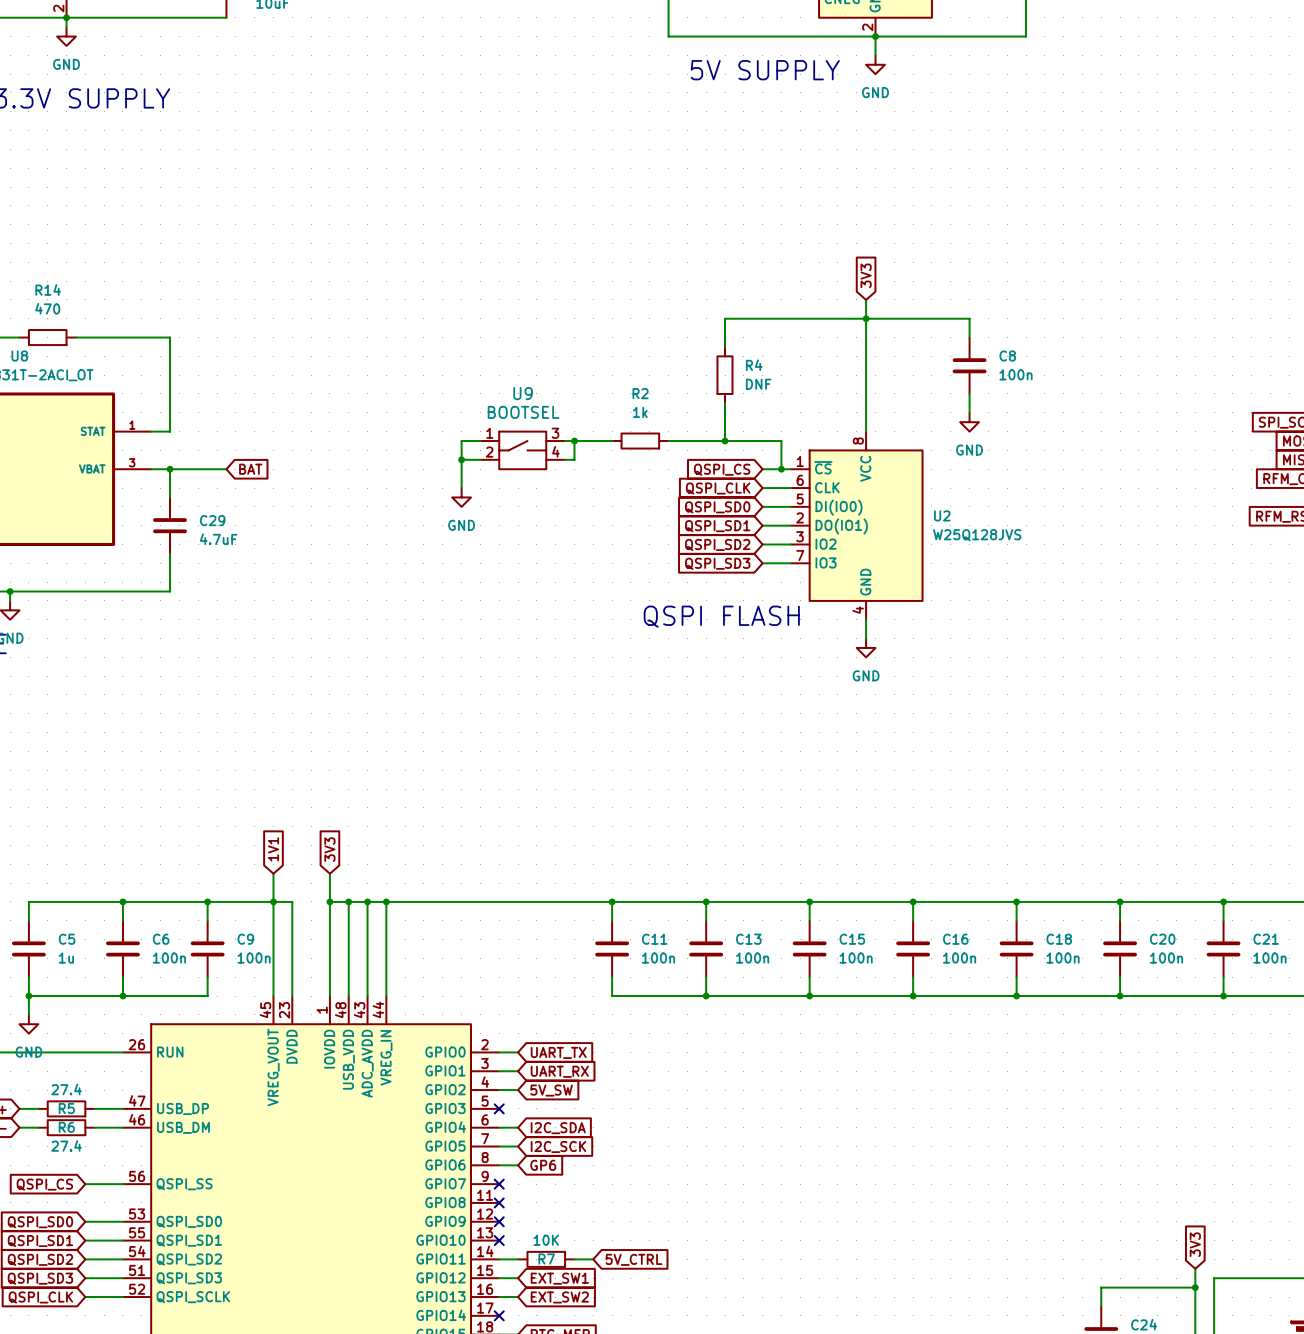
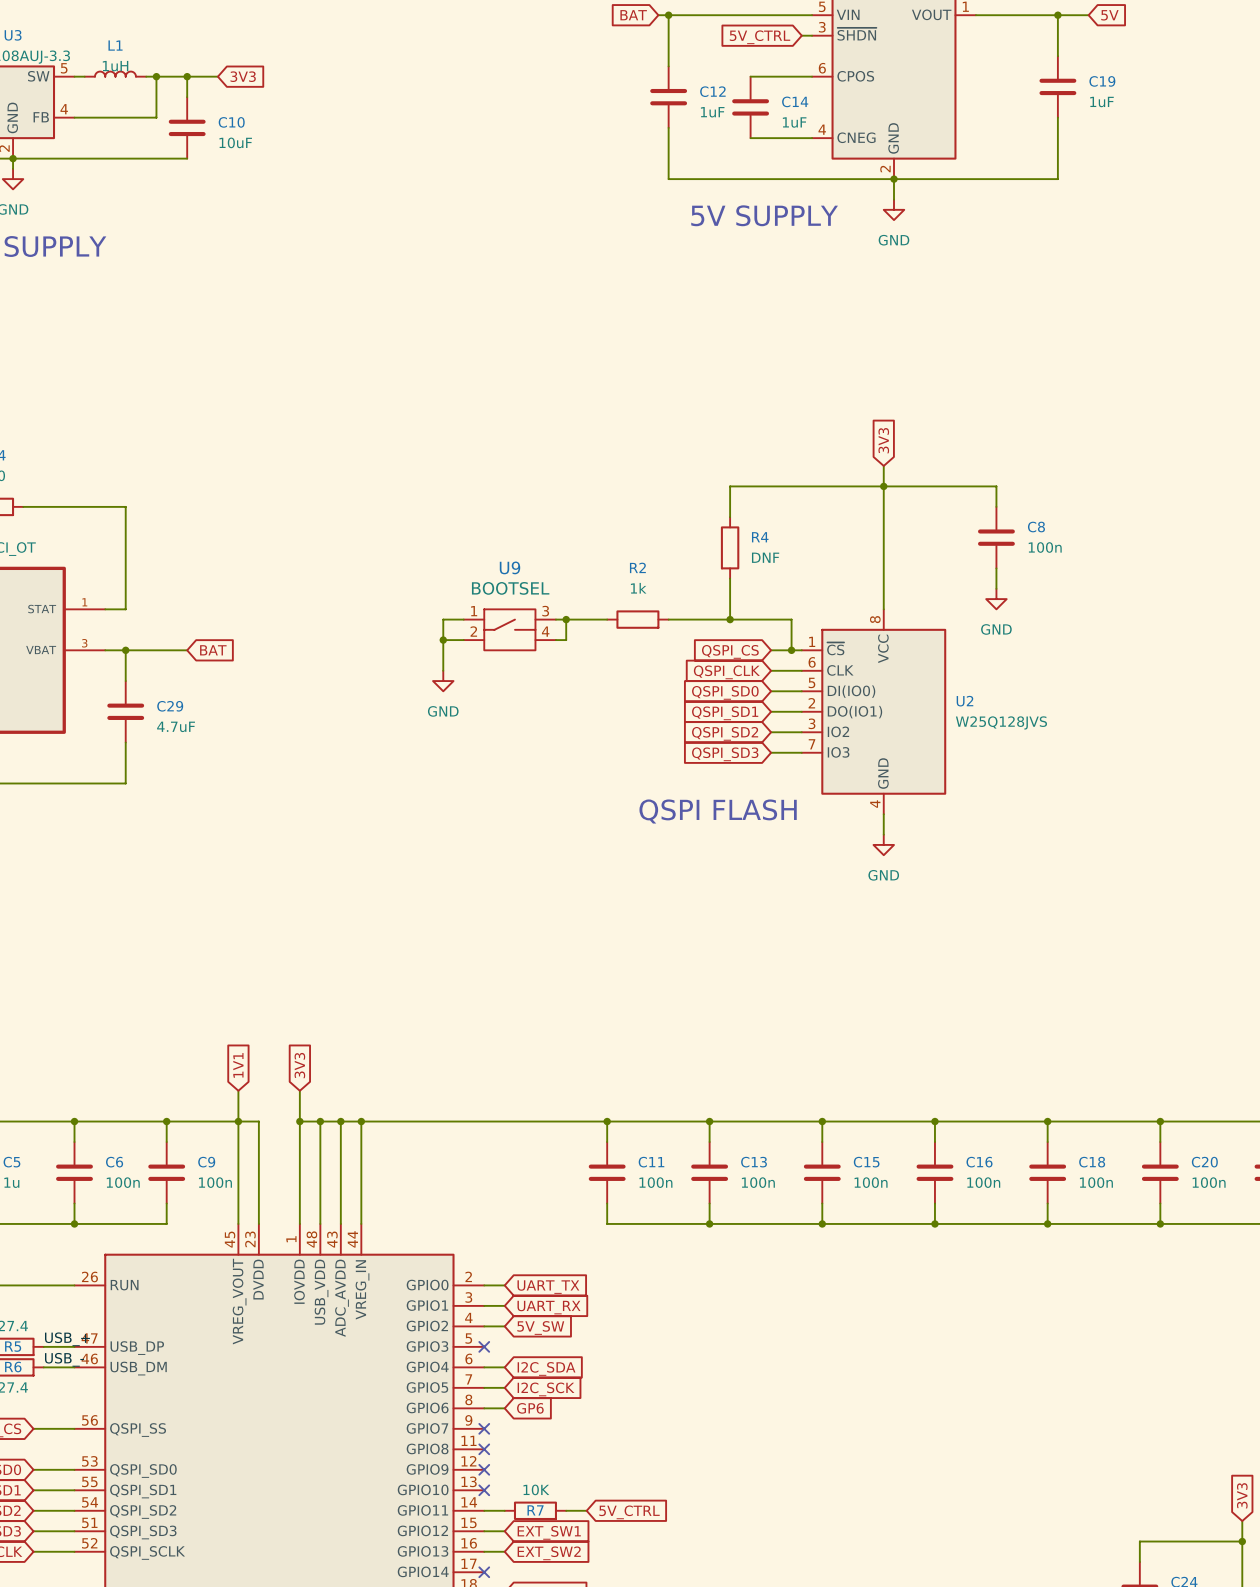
label: none -> USB_+ (67, 1339)
label: none -> USB_- (64, 1359)

